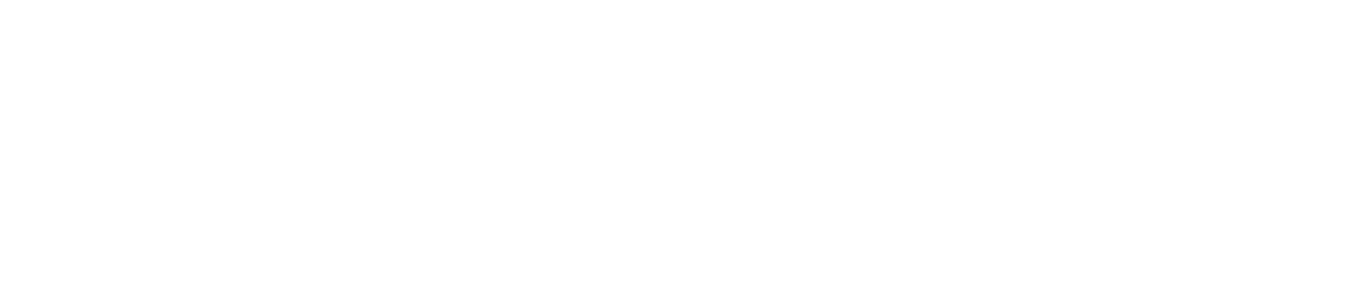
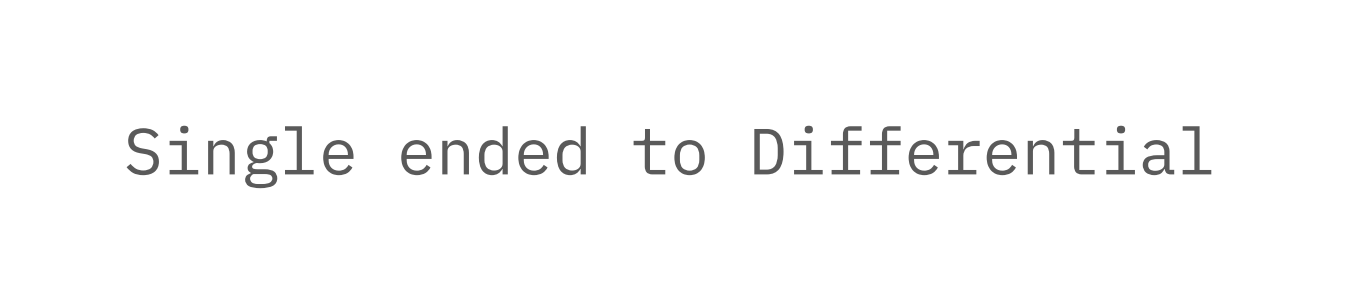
text: none -> Single ended to Differential (668, 156)

